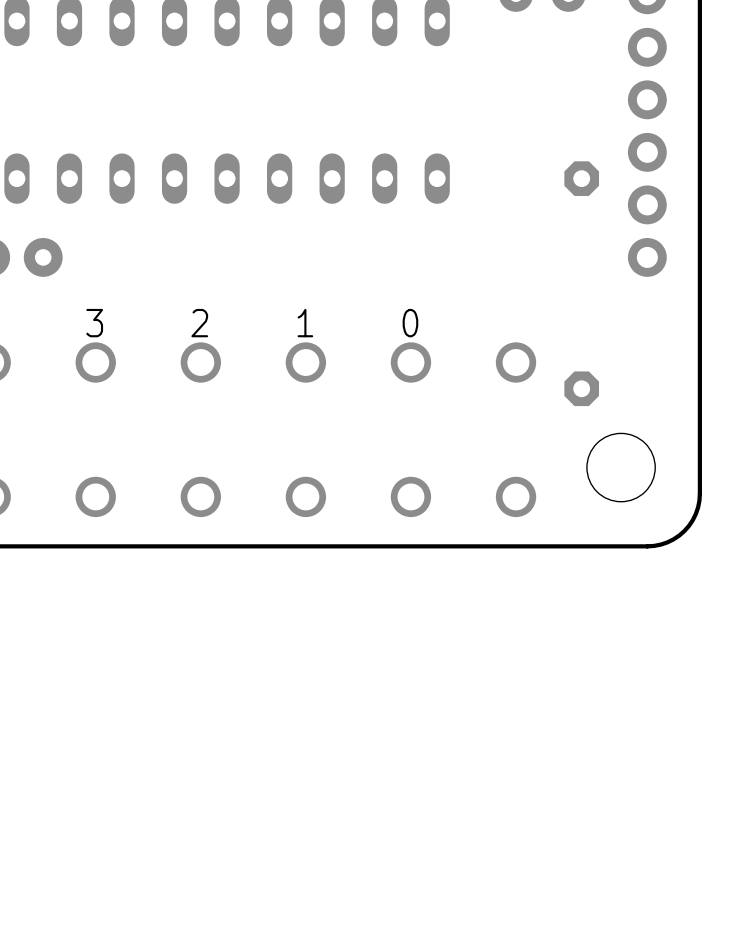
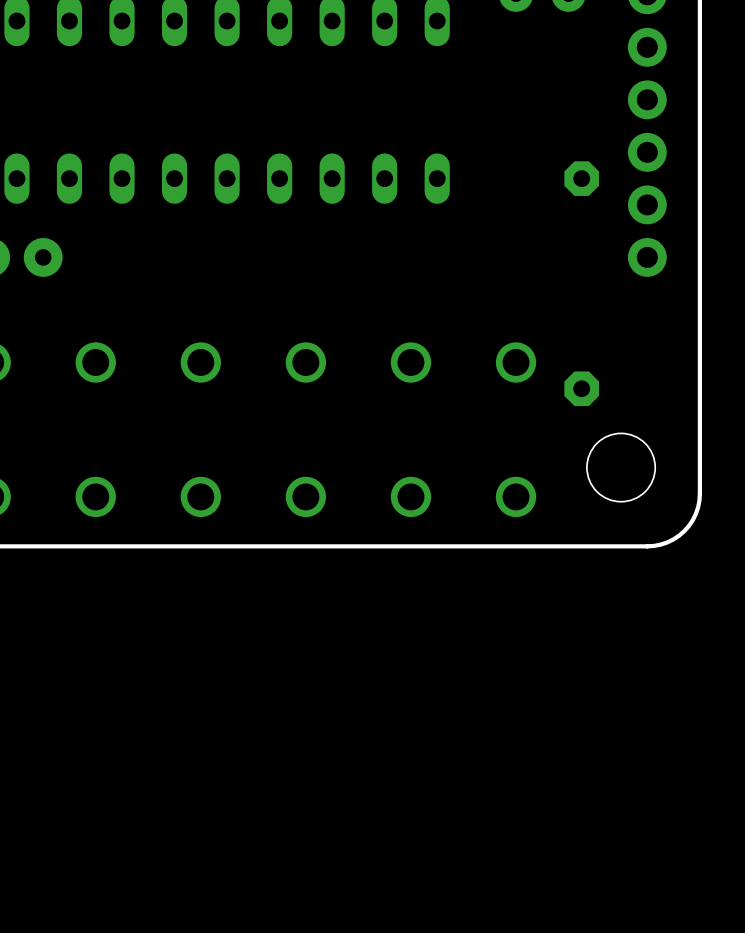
text: 3 (94, 323) -> none
text: 2 (199, 323) -> none
text: 1 (305, 323) -> none
text: 0 (410, 323) -> none

